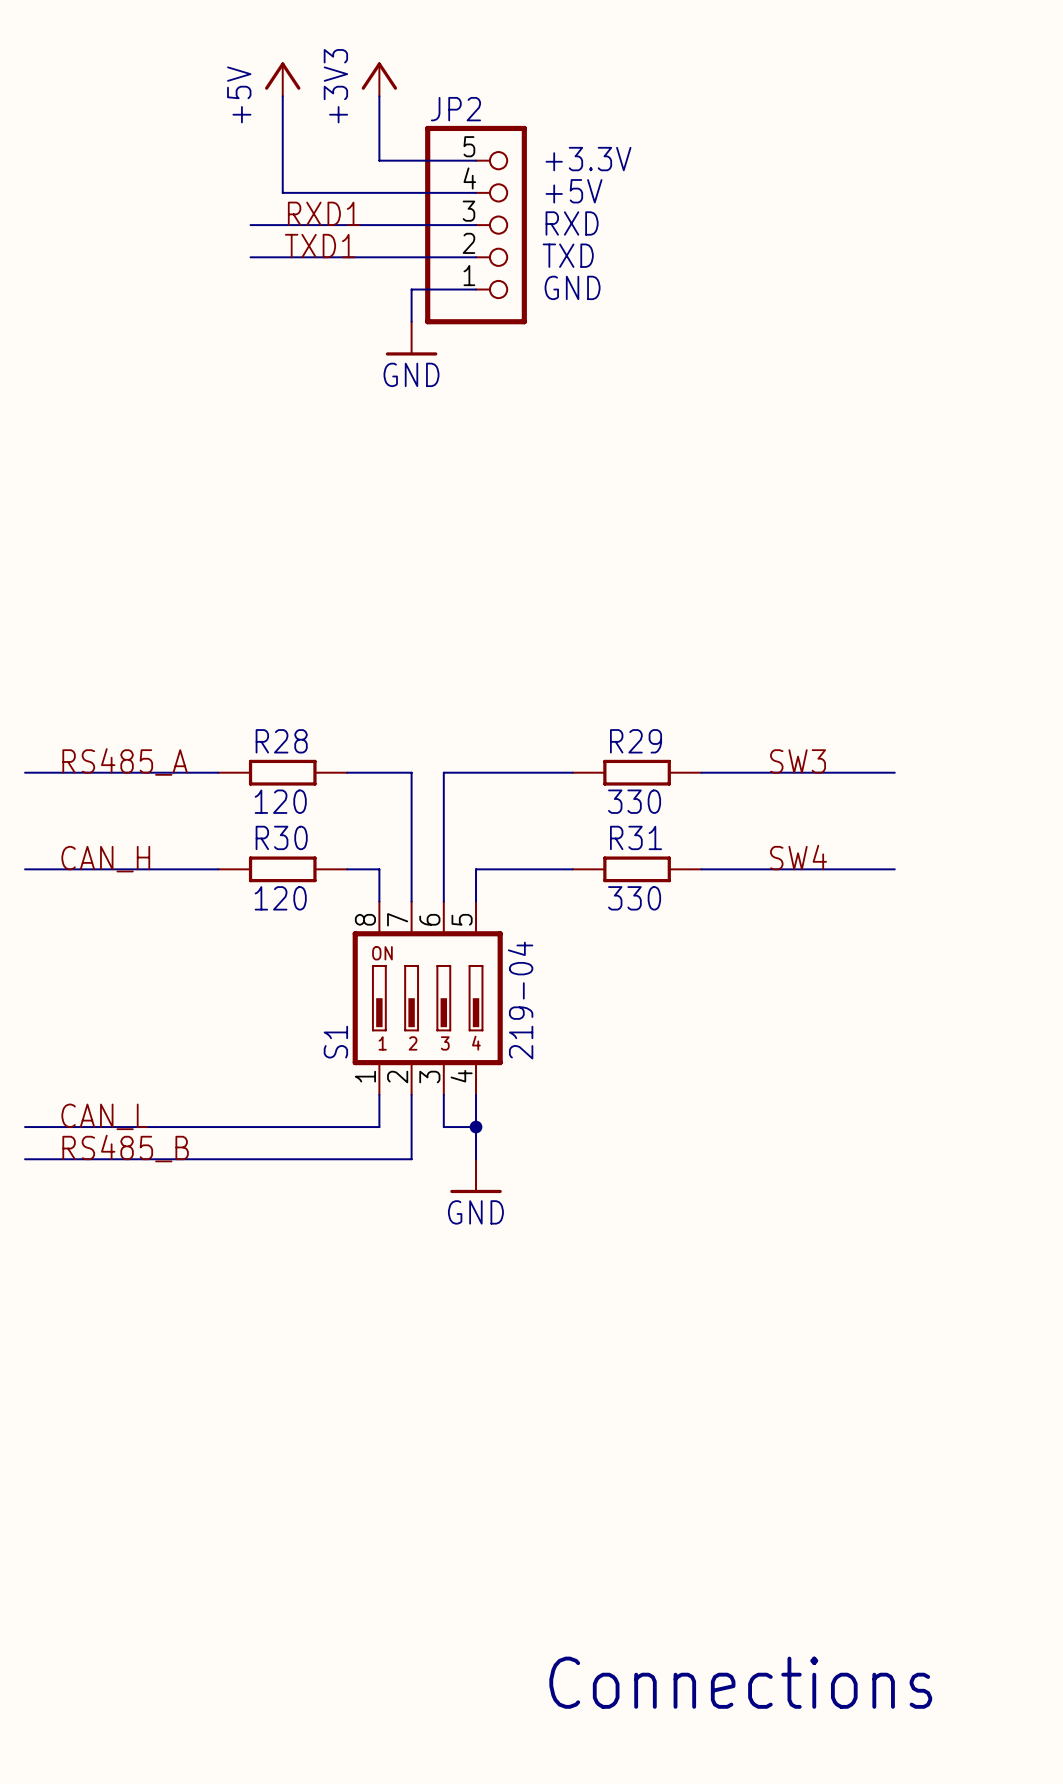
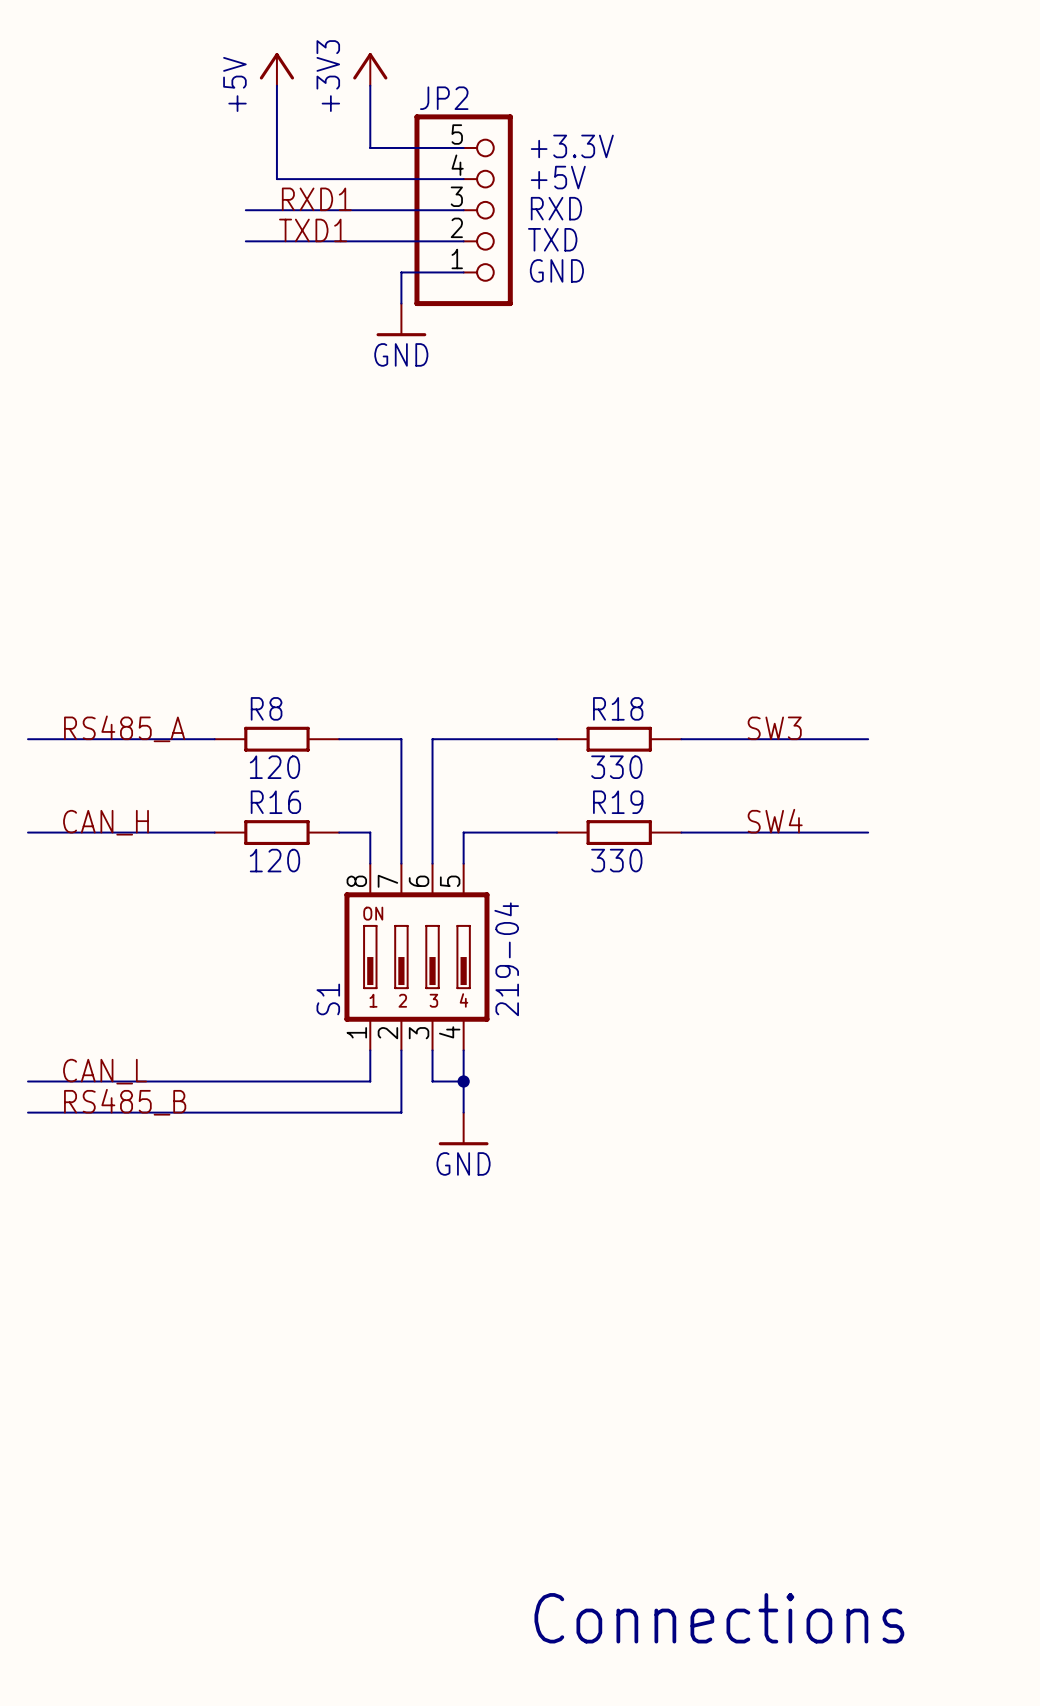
R28 name: R28 (281, 741) -> R8 (266, 708)
R29 name: R29 (636, 741) -> R18 (618, 708)
R30 name: R30 (281, 837) -> R16 (275, 802)
R31 name: R31 (636, 837) -> R19 (618, 802)

